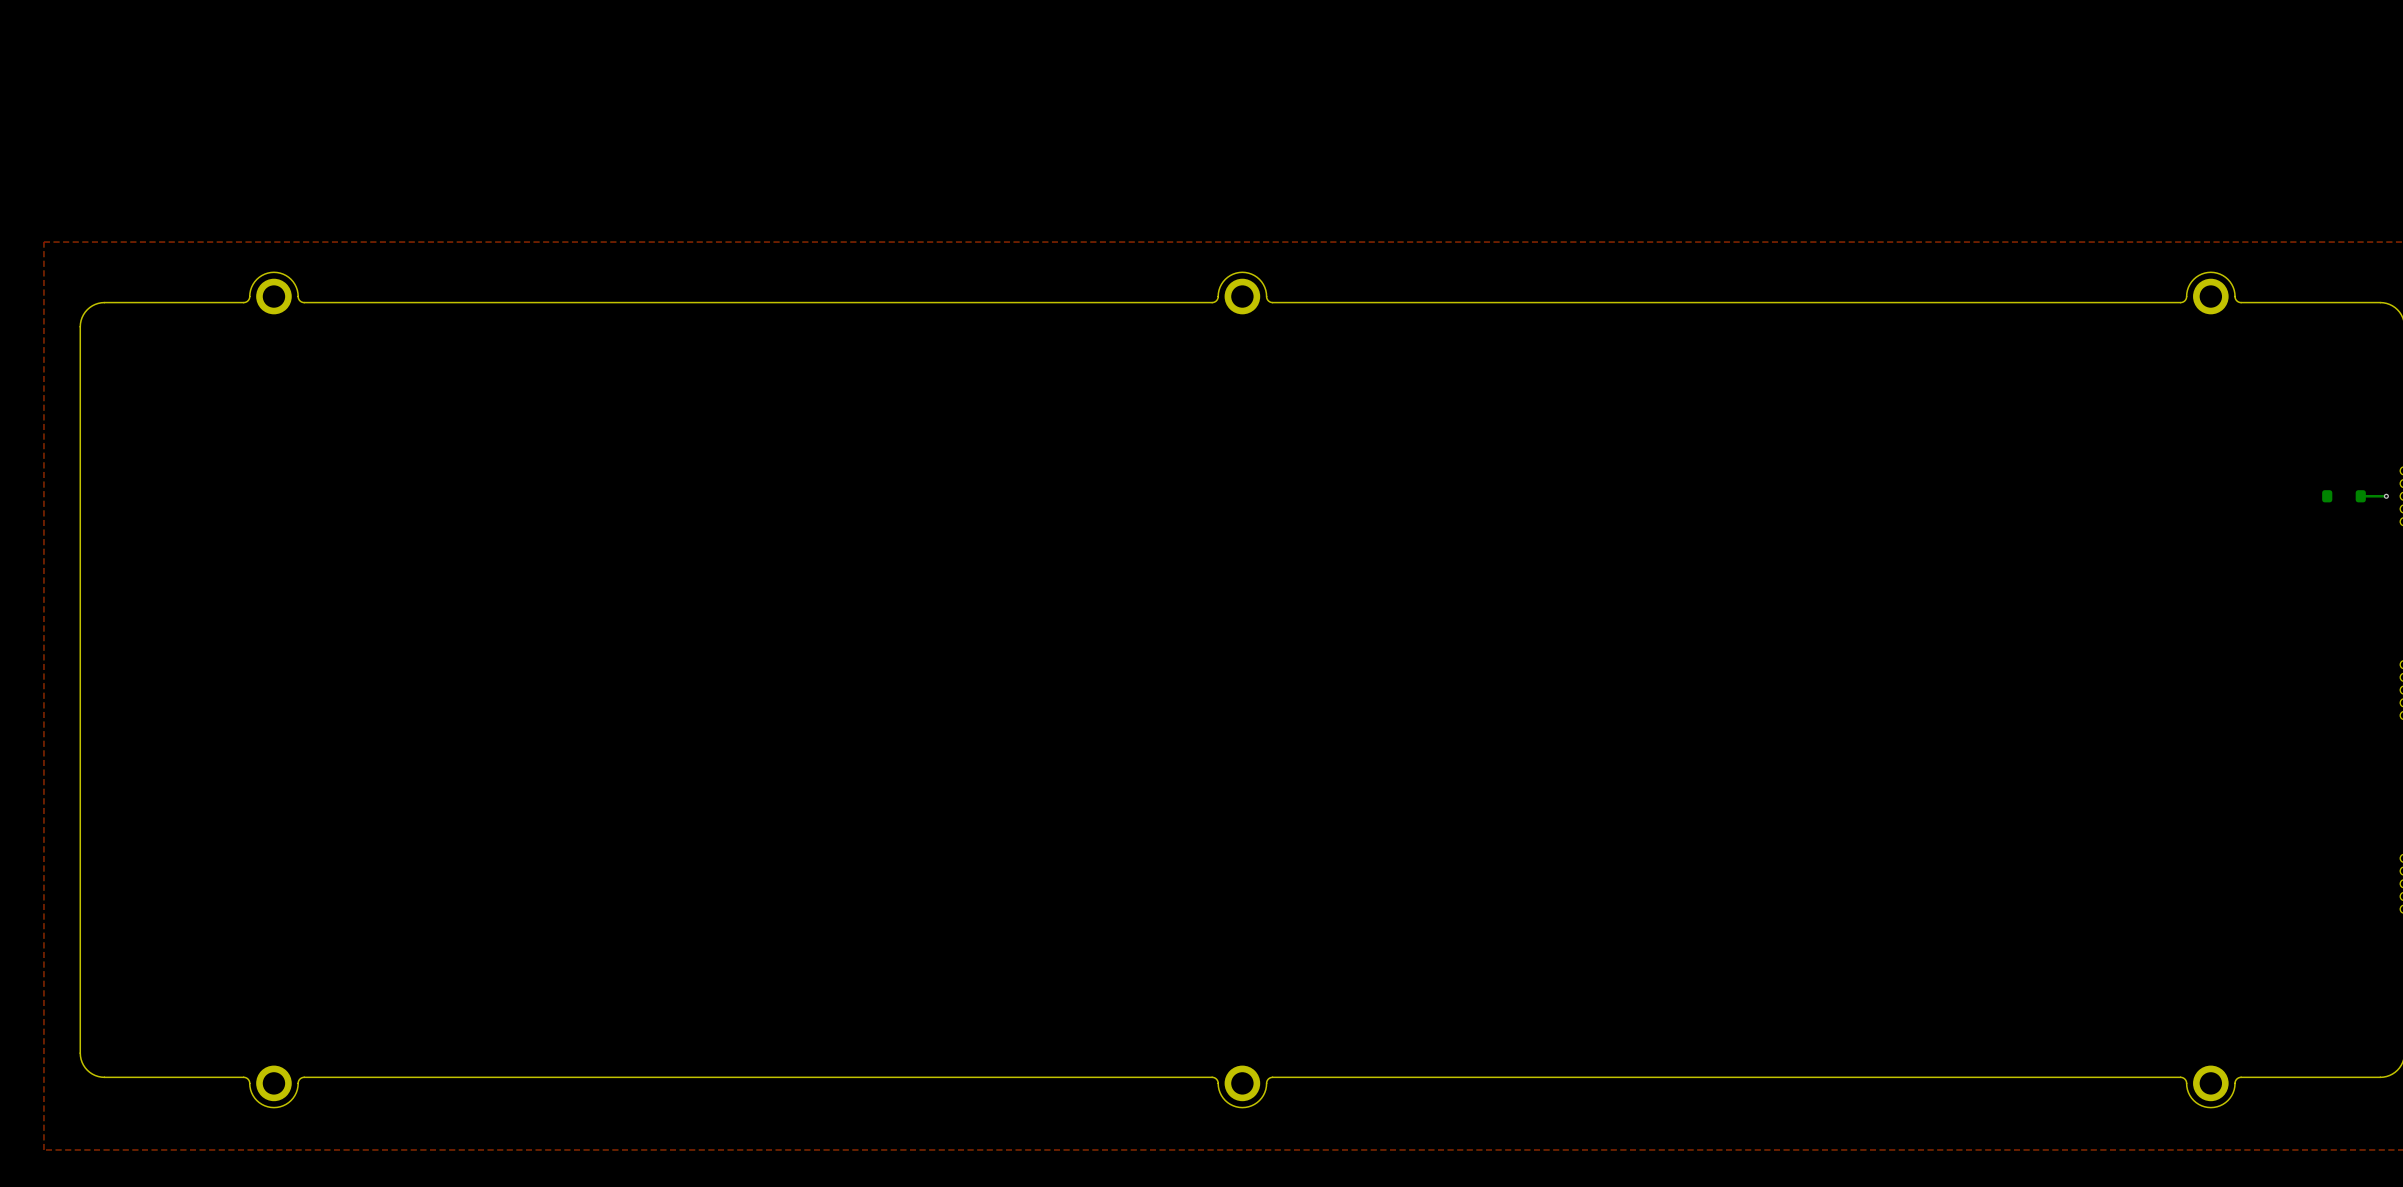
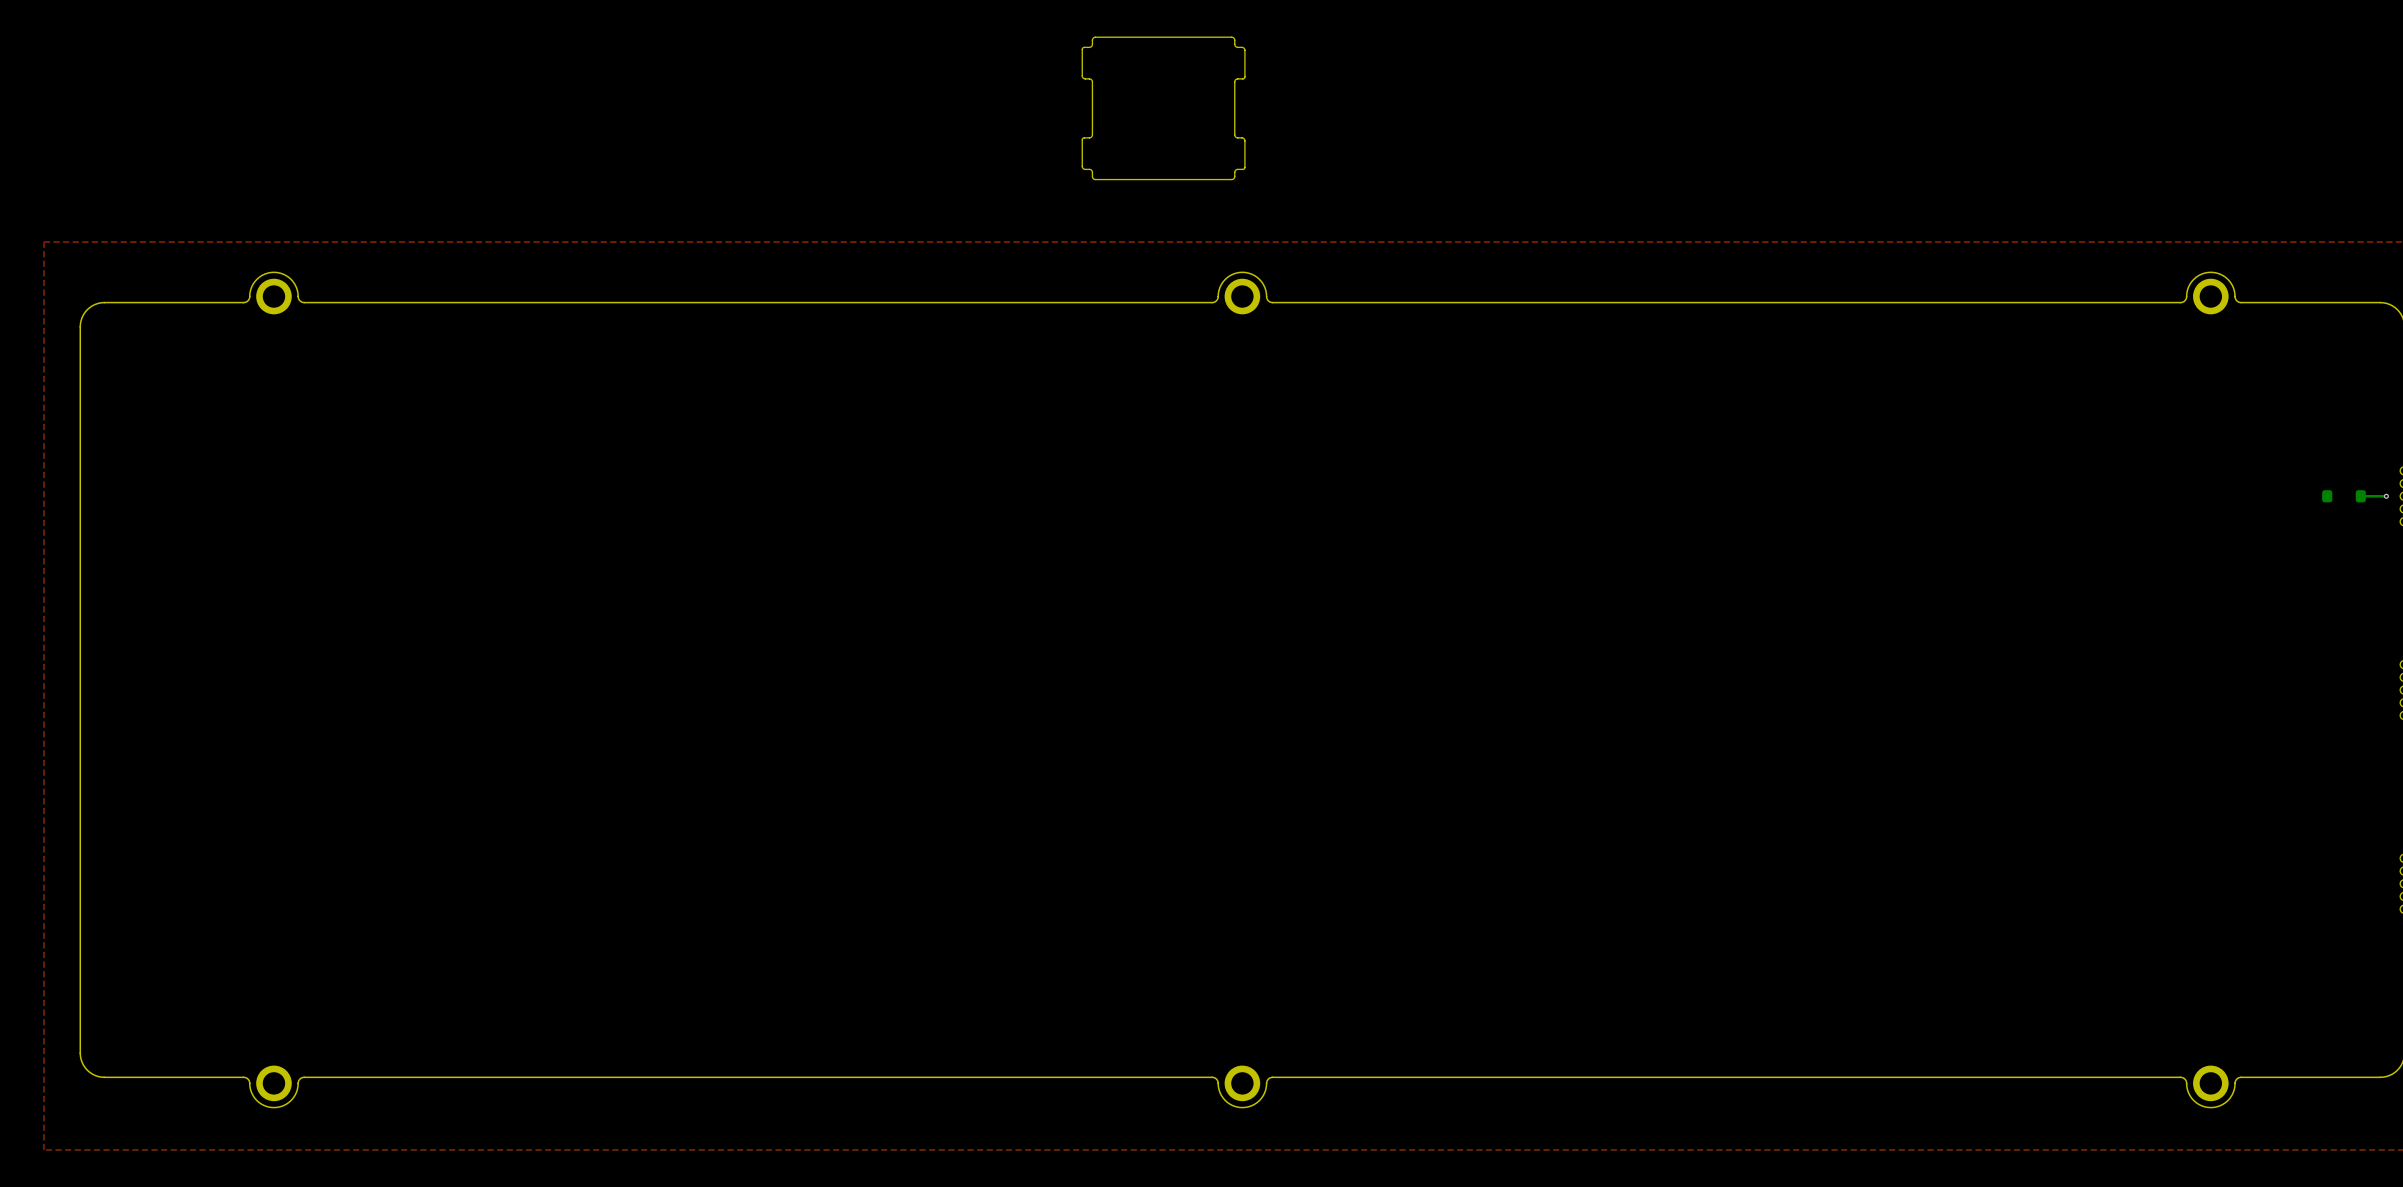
drawing: none -> [1081, 36, 1246, 181]

